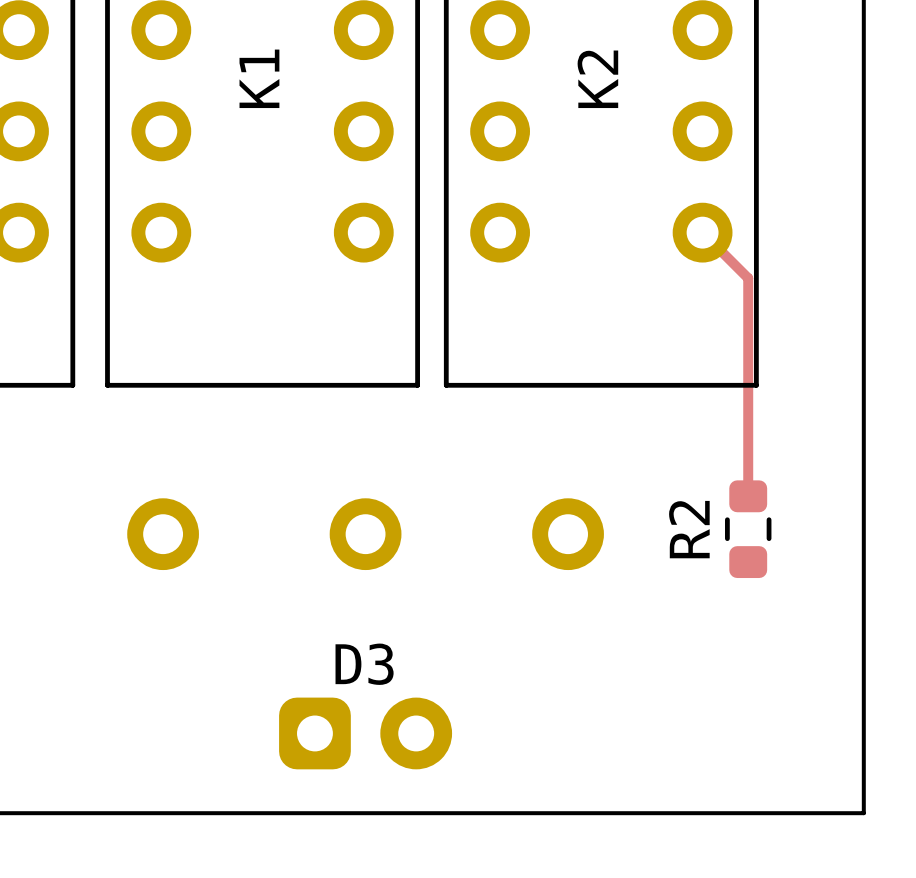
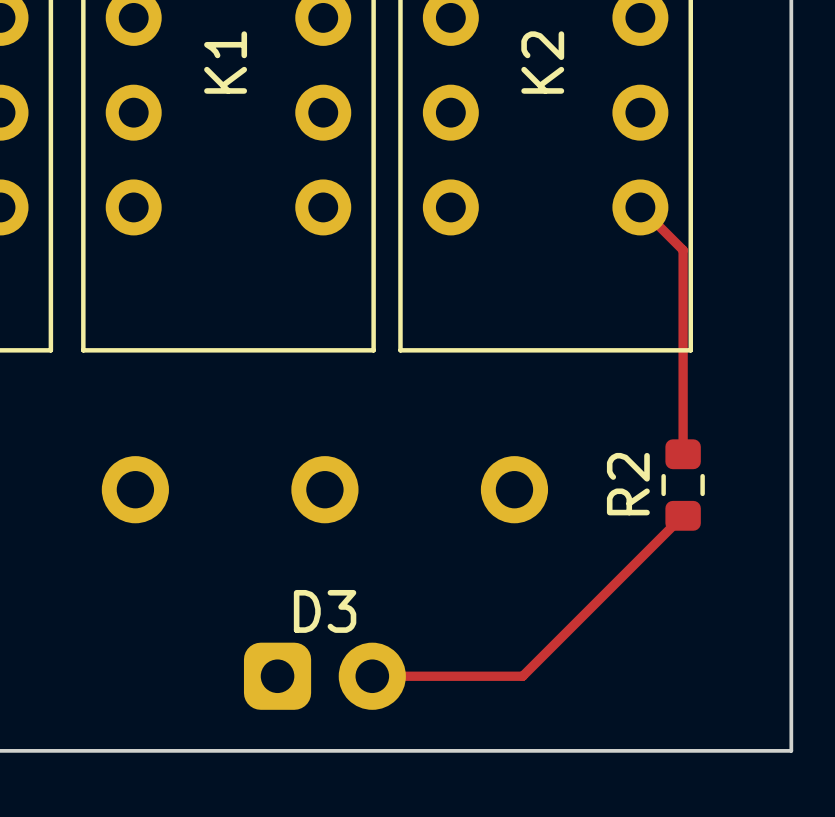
top track: none -> (683, 515) (522, 676) (372, 676)

